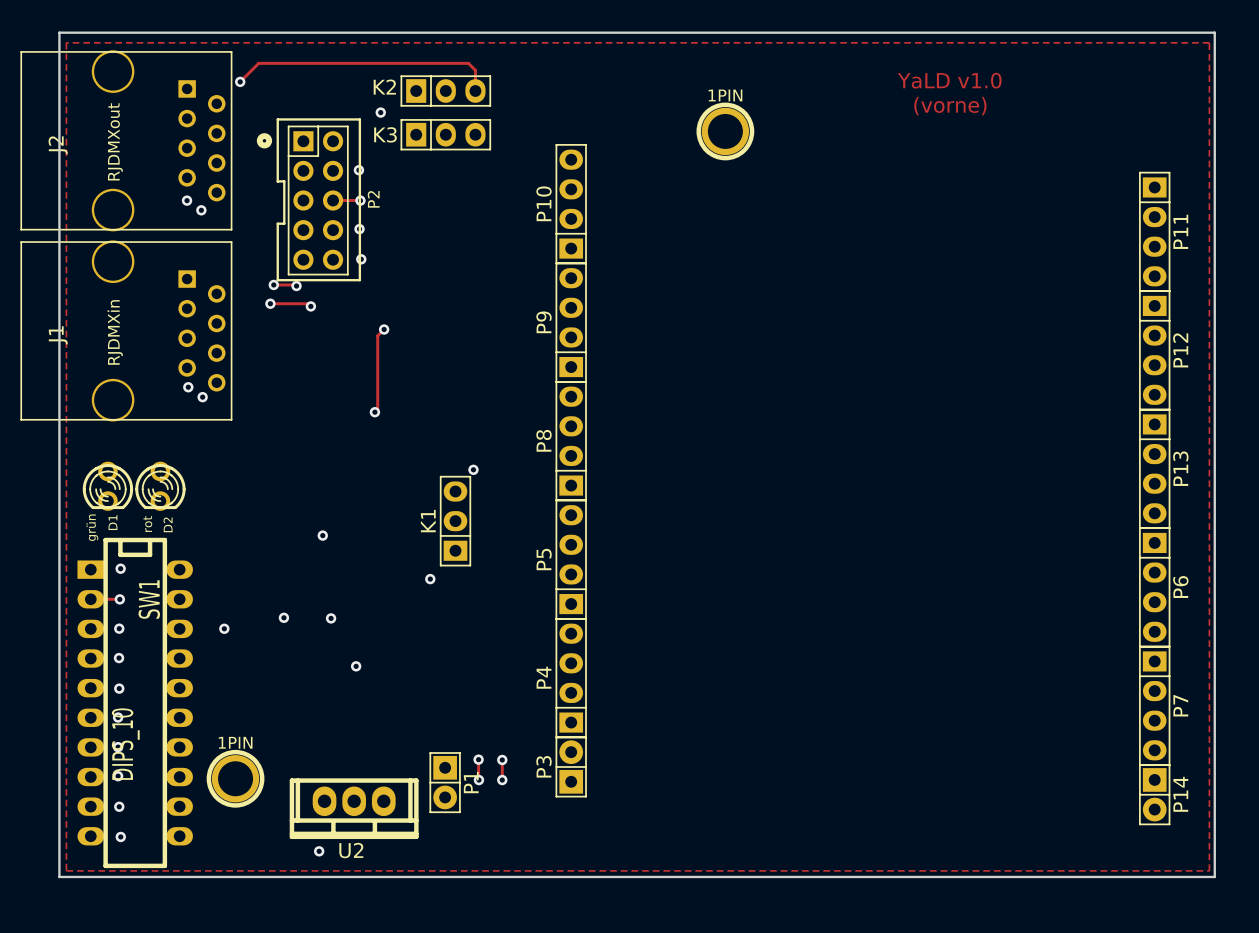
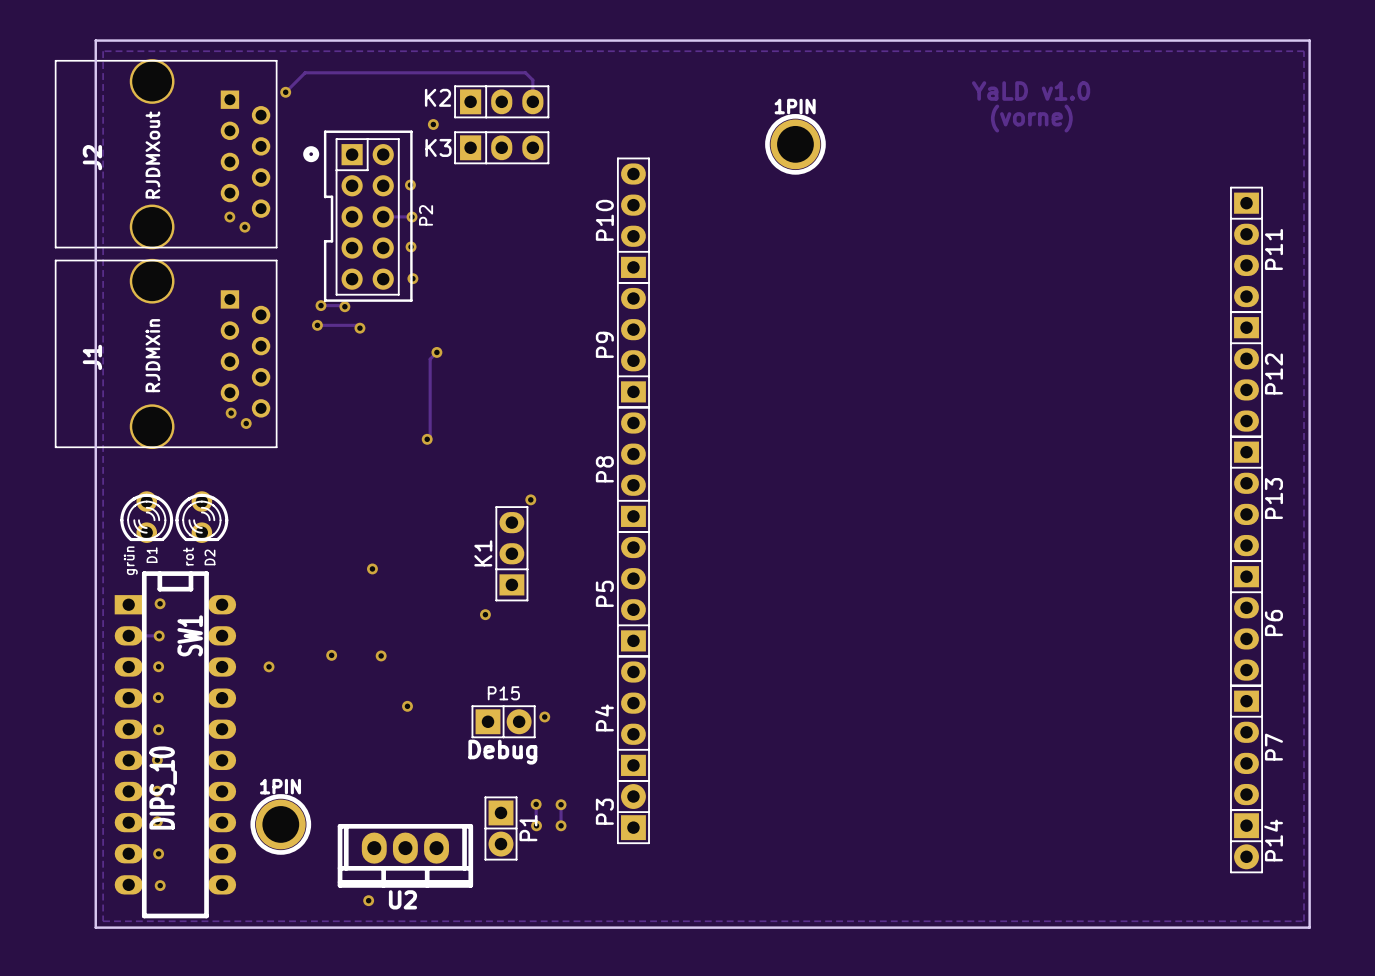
via: none -> (544, 716)
P15: none -> (503, 721)
text: none -> Debug (502, 752)

